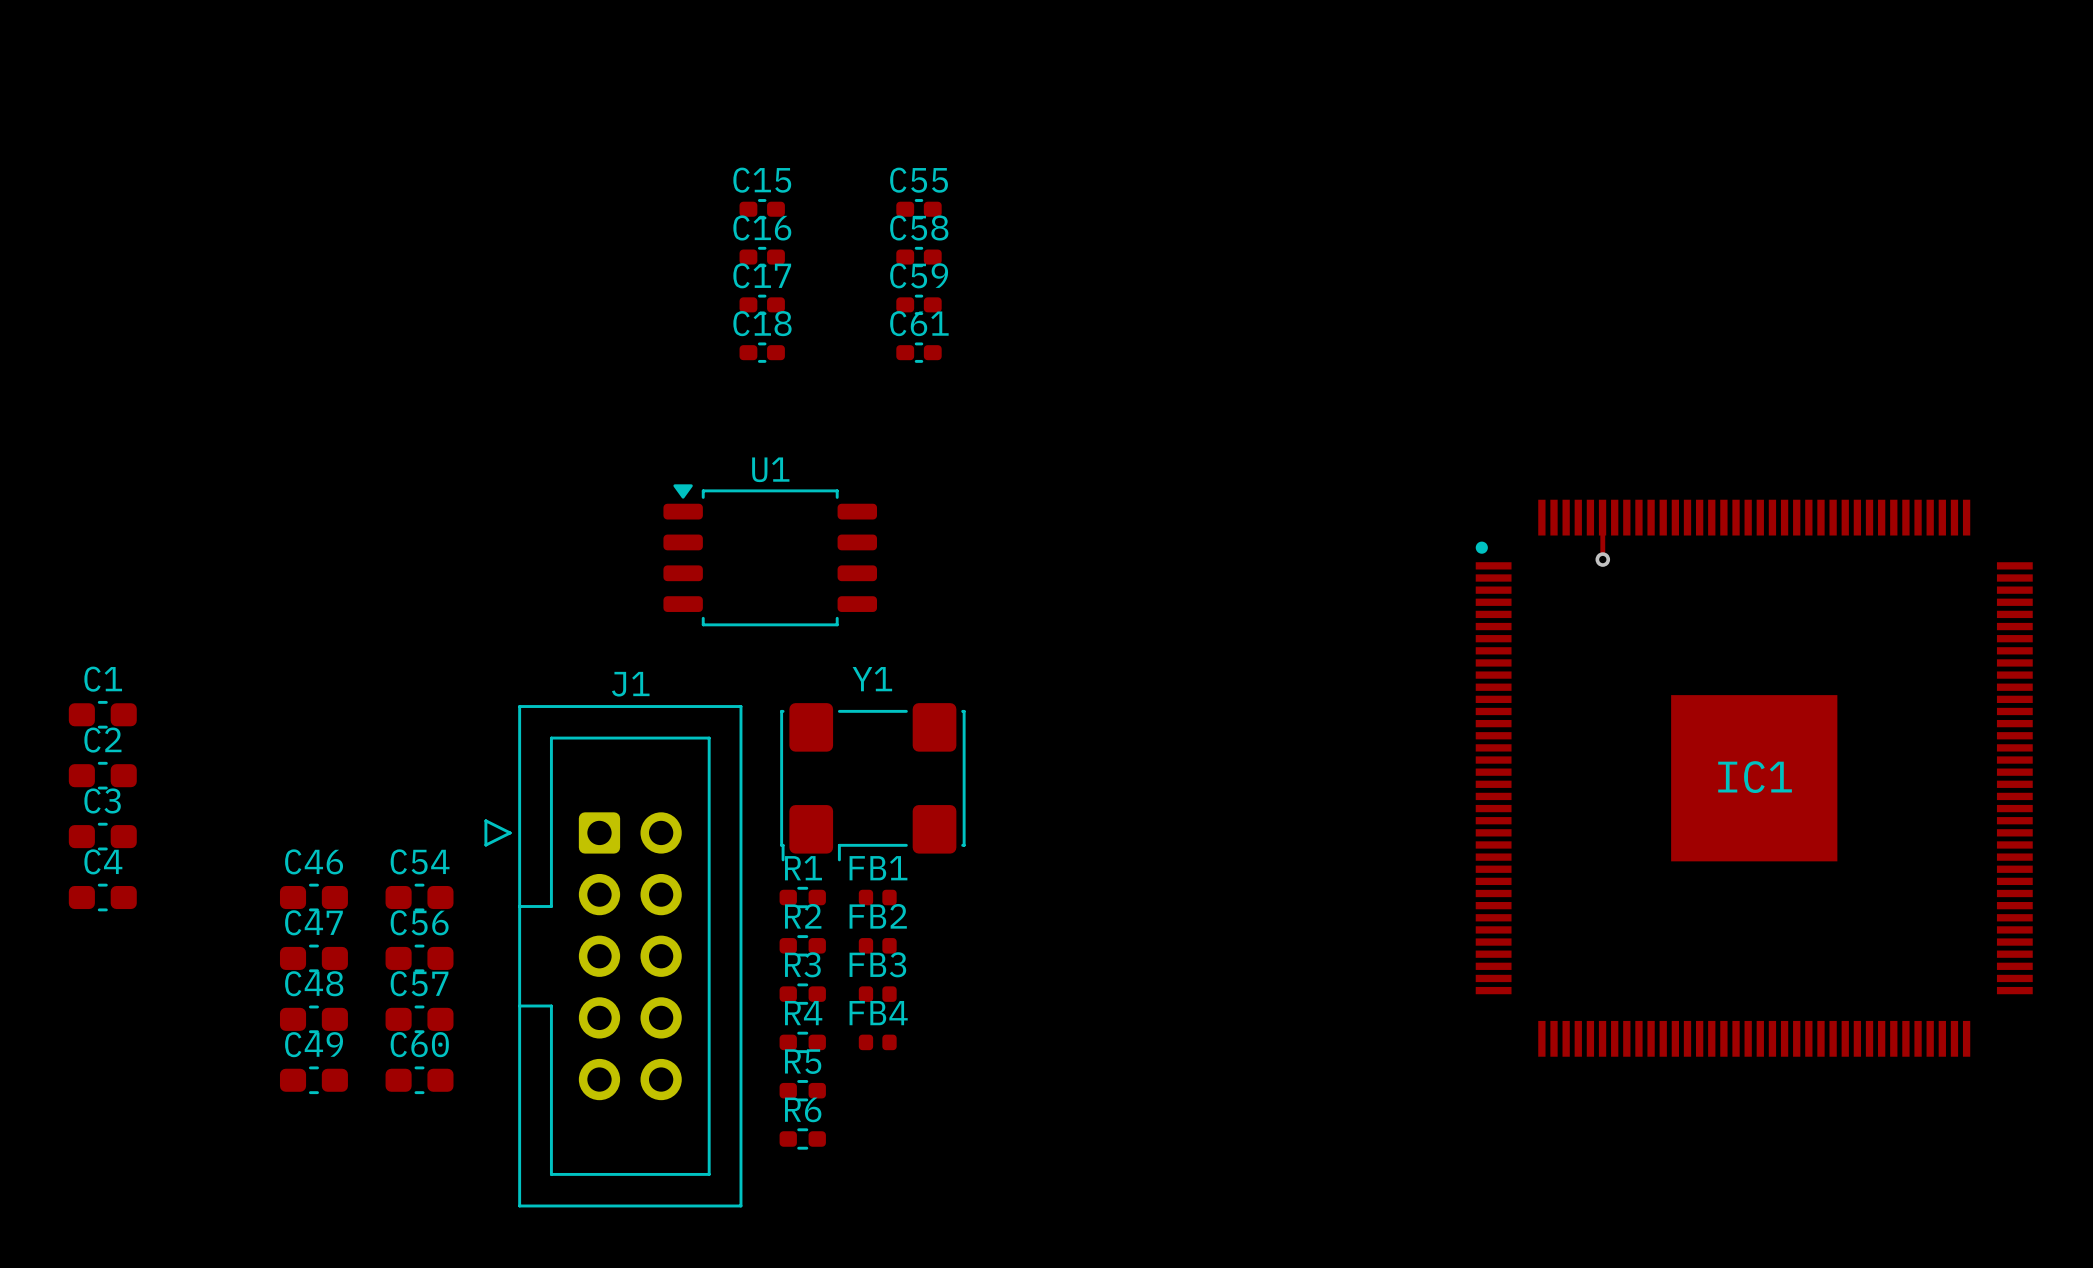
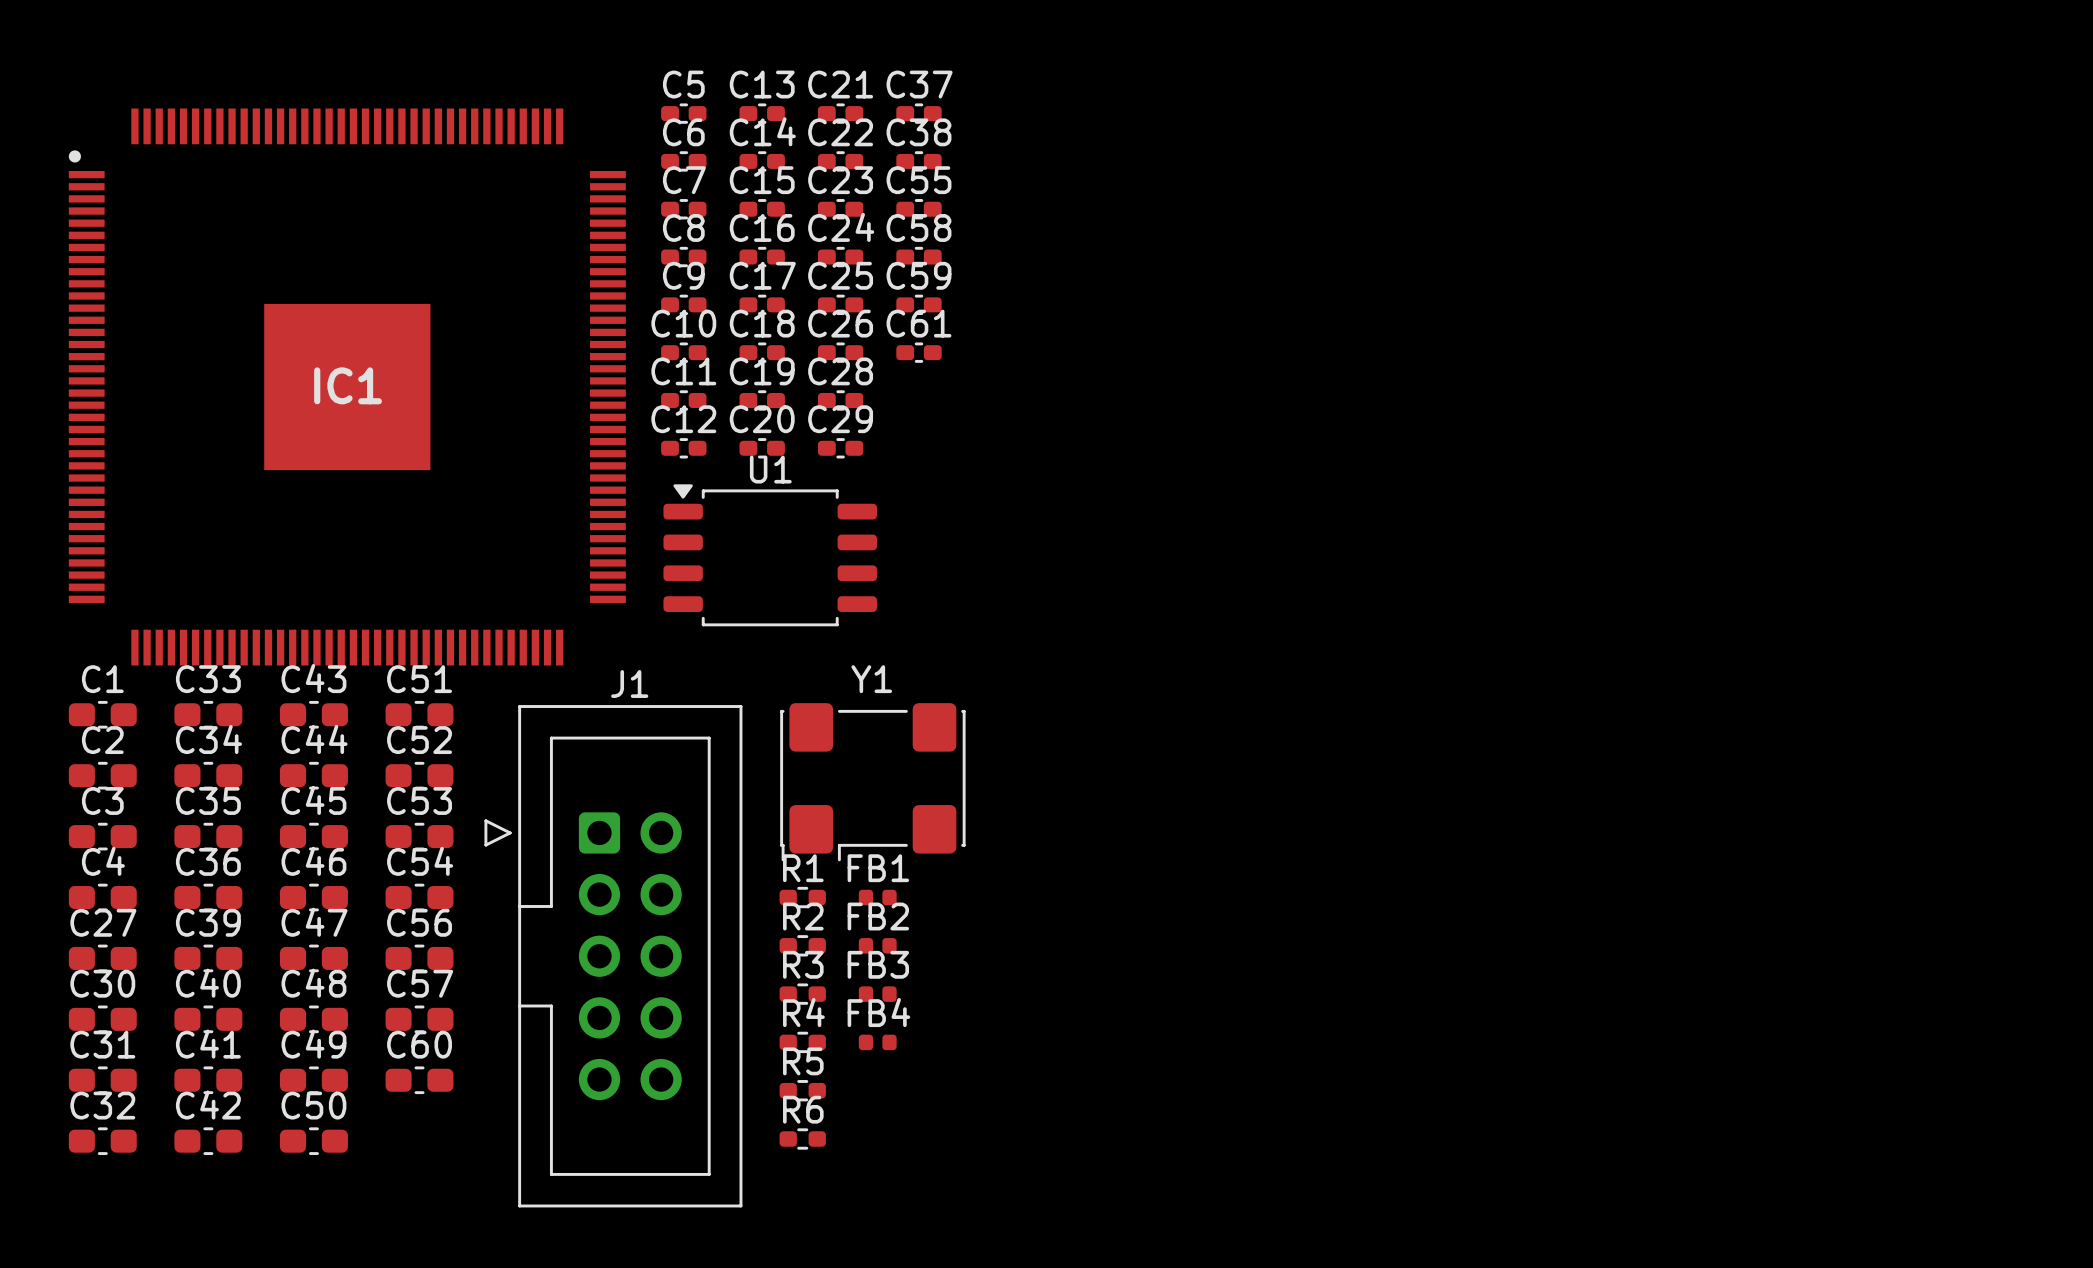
C5: none -> (683, 113)
C13: none -> (762, 113)
C21: none -> (840, 113)
C37: none -> (918, 113)
C6: none -> (683, 161)
C14: none -> (762, 161)
C22: none -> (840, 161)
C38: none -> (918, 161)
C7: none -> (683, 209)
C23: none -> (840, 209)
C8: none -> (683, 257)
C24: none -> (840, 257)
C9: none -> (683, 304)
C25: none -> (840, 304)
C10: none -> (683, 352)
C26: none -> (840, 352)
C11: none -> (683, 400)
C19: none -> (762, 400)
C28: none -> (840, 400)
C12: none -> (683, 448)
C20: none -> (762, 448)
C29: none -> (840, 448)
track: (1602, 517) (1602, 559) -> none
via: (1602, 559) -> none
C33: none -> (208, 714)
C43: none -> (313, 714)
C51: none -> (419, 714)
C34: none -> (208, 775)
C44: none -> (313, 775)
C52: none -> (419, 775)
IC1 position: (1754, 778) -> (347, 387)
C35: none -> (208, 836)
C45: none -> (313, 836)
C53: none -> (419, 836)
C36: none -> (208, 897)
C27: none -> (102, 958)
C39: none -> (208, 958)
C30: none -> (102, 1019)
C40: none -> (208, 1019)
C31: none -> (102, 1080)
C41: none -> (208, 1080)
C32: none -> (102, 1141)
C42: none -> (208, 1141)
C50: none -> (313, 1141)

